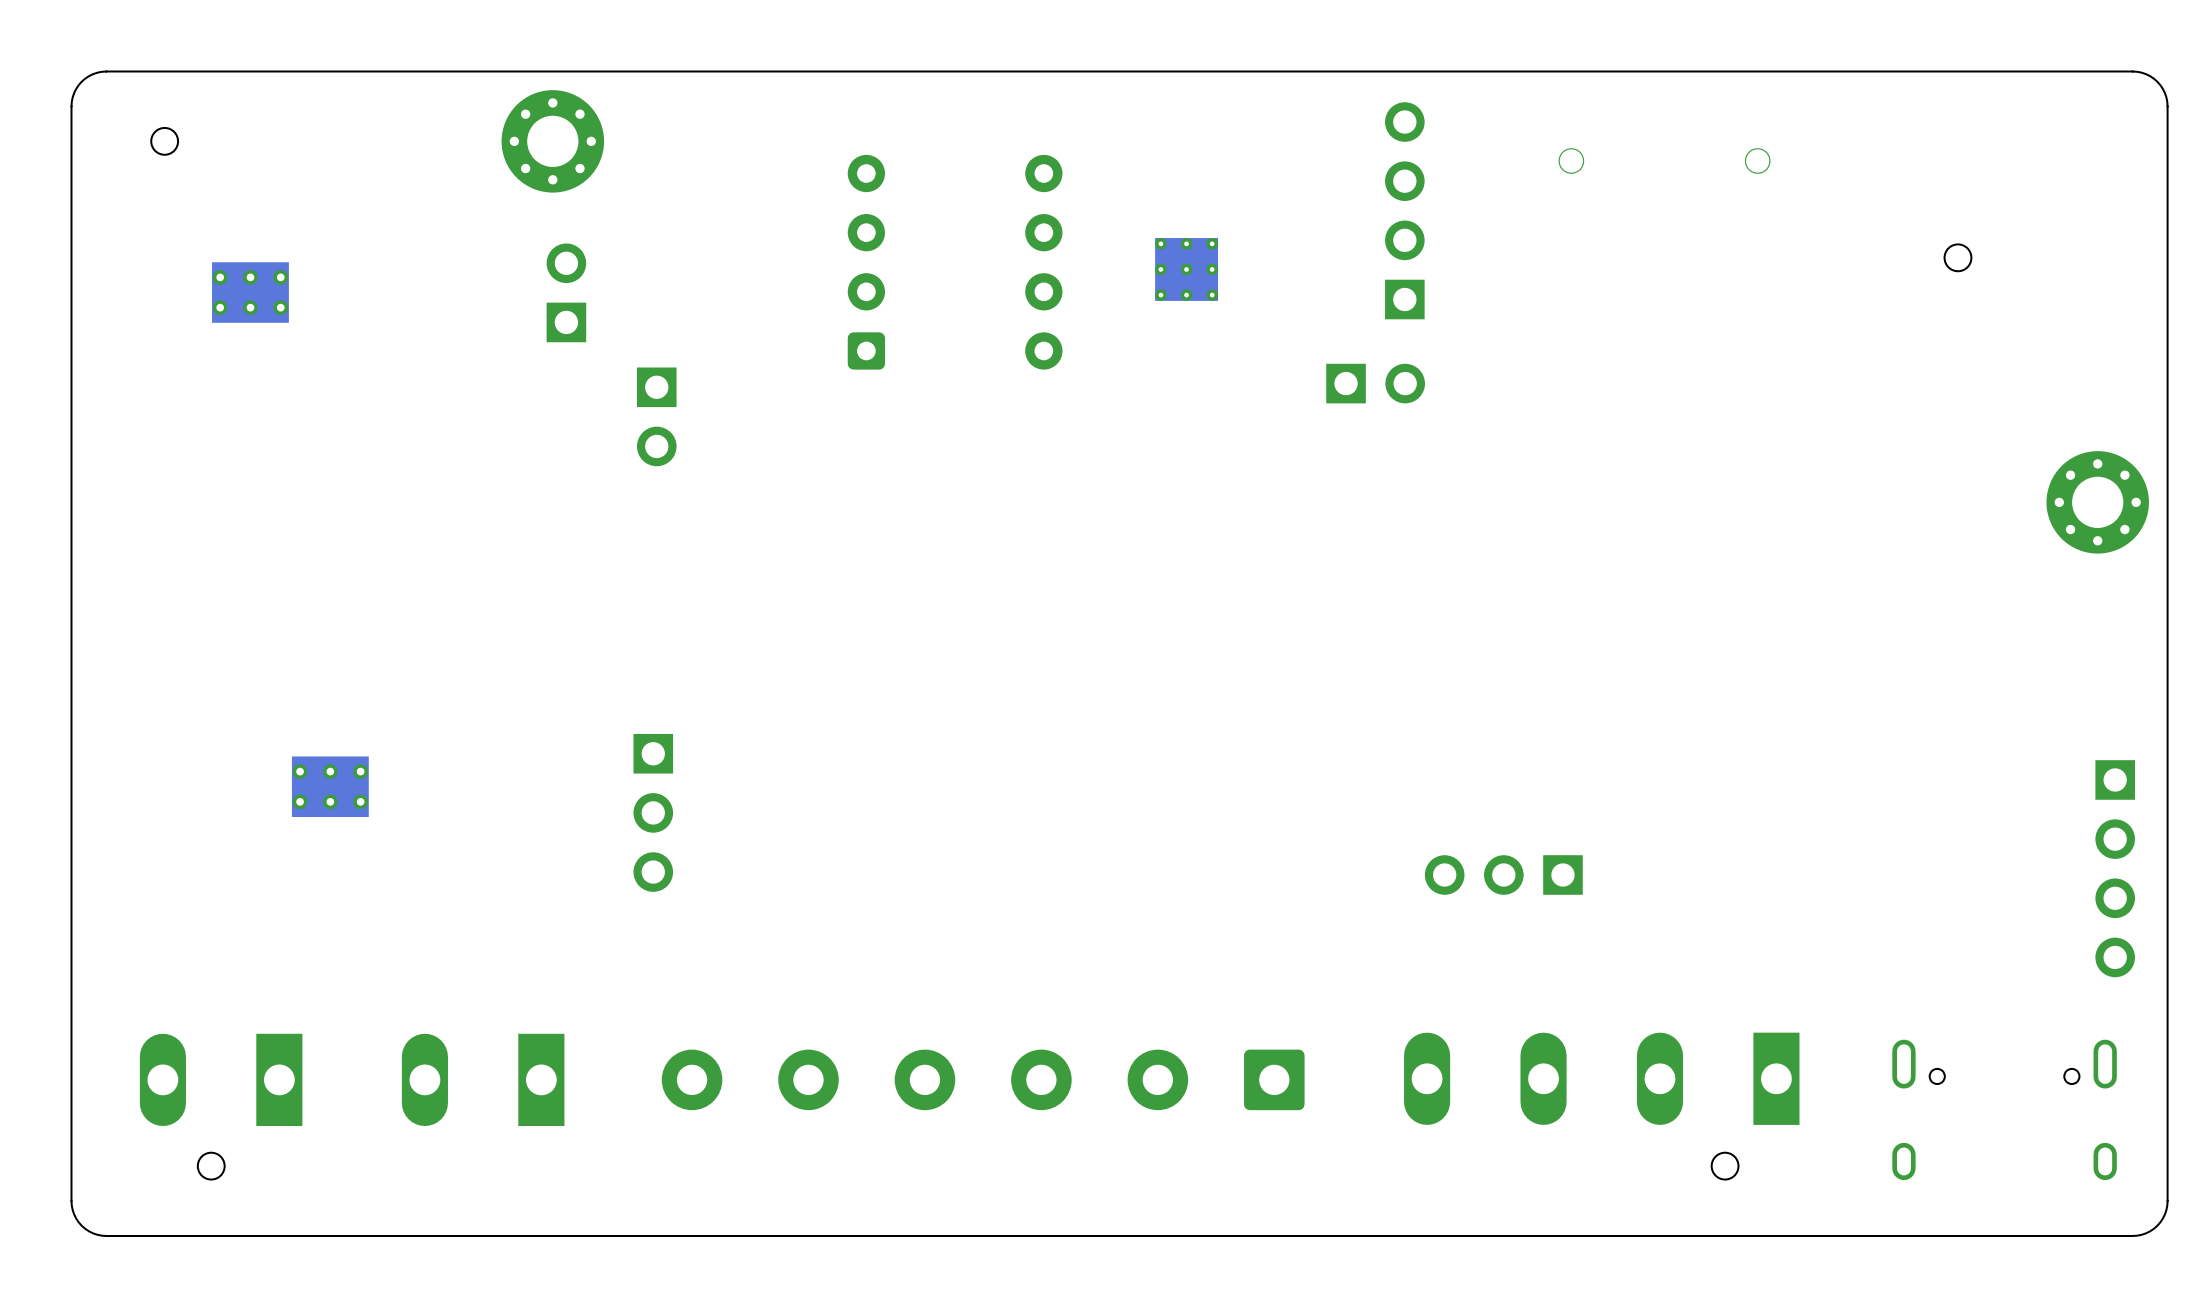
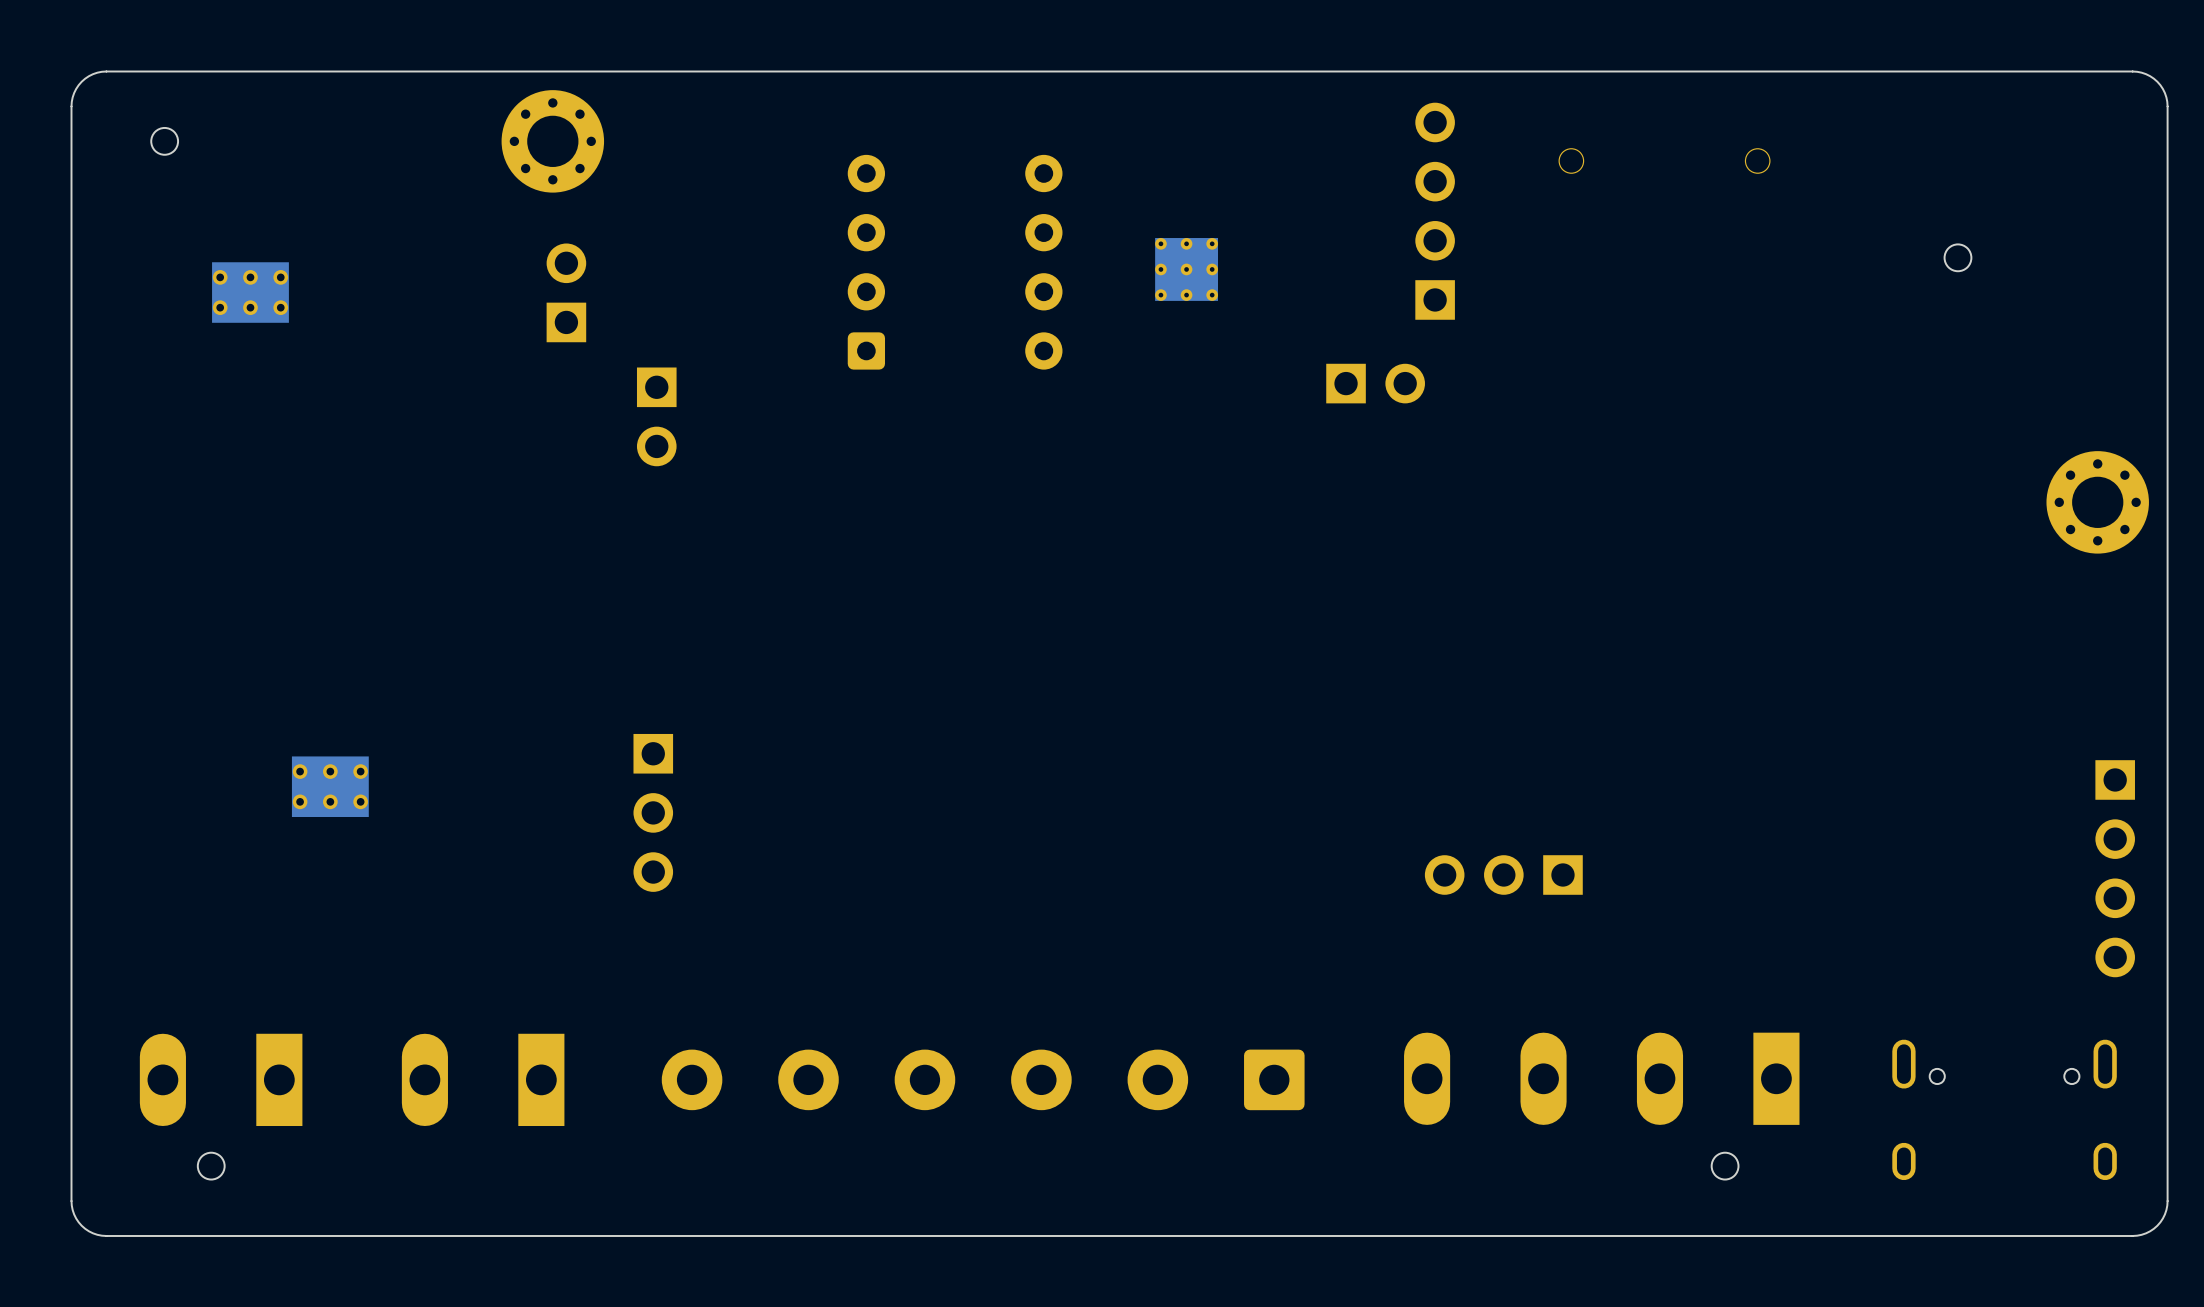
part position: (1404, 210) -> (1435, 211)

